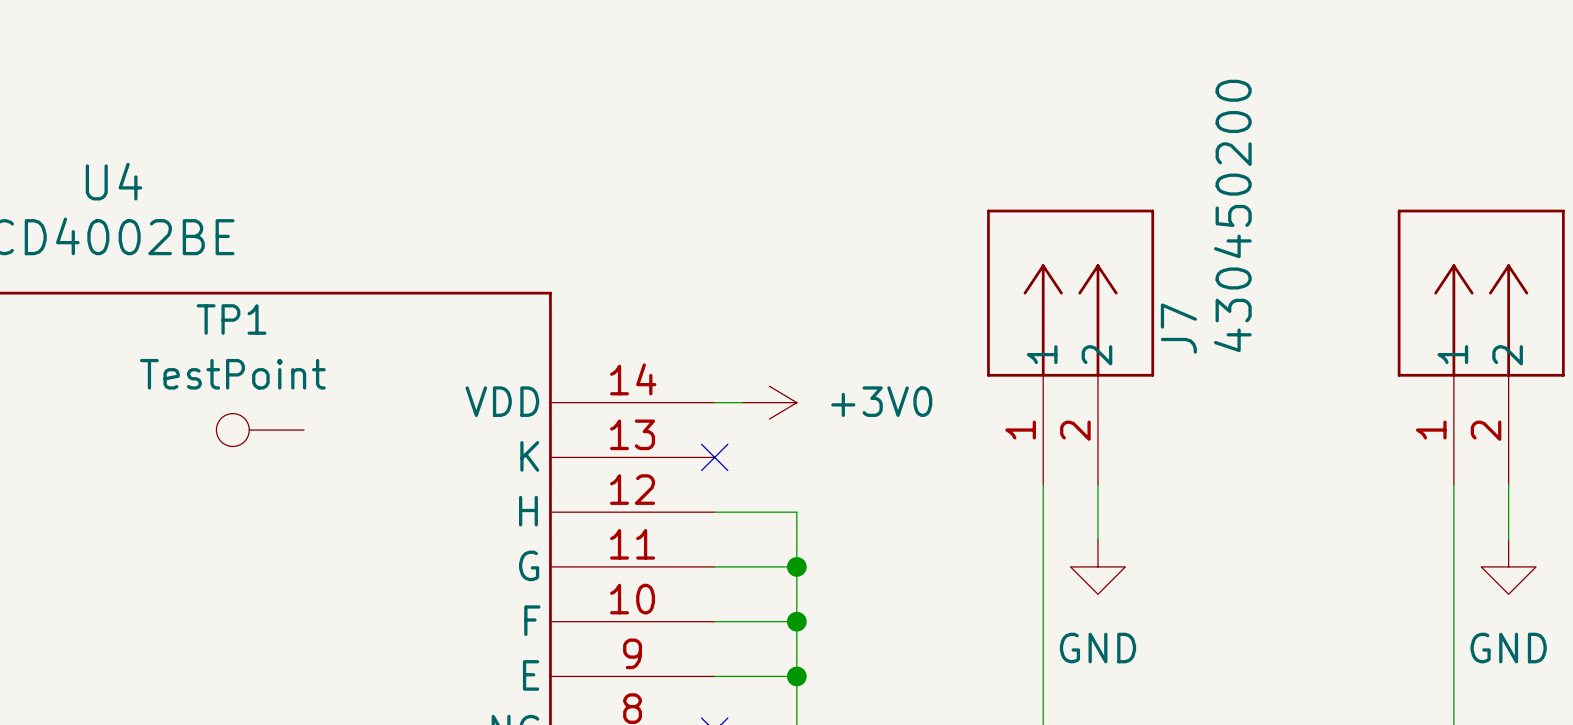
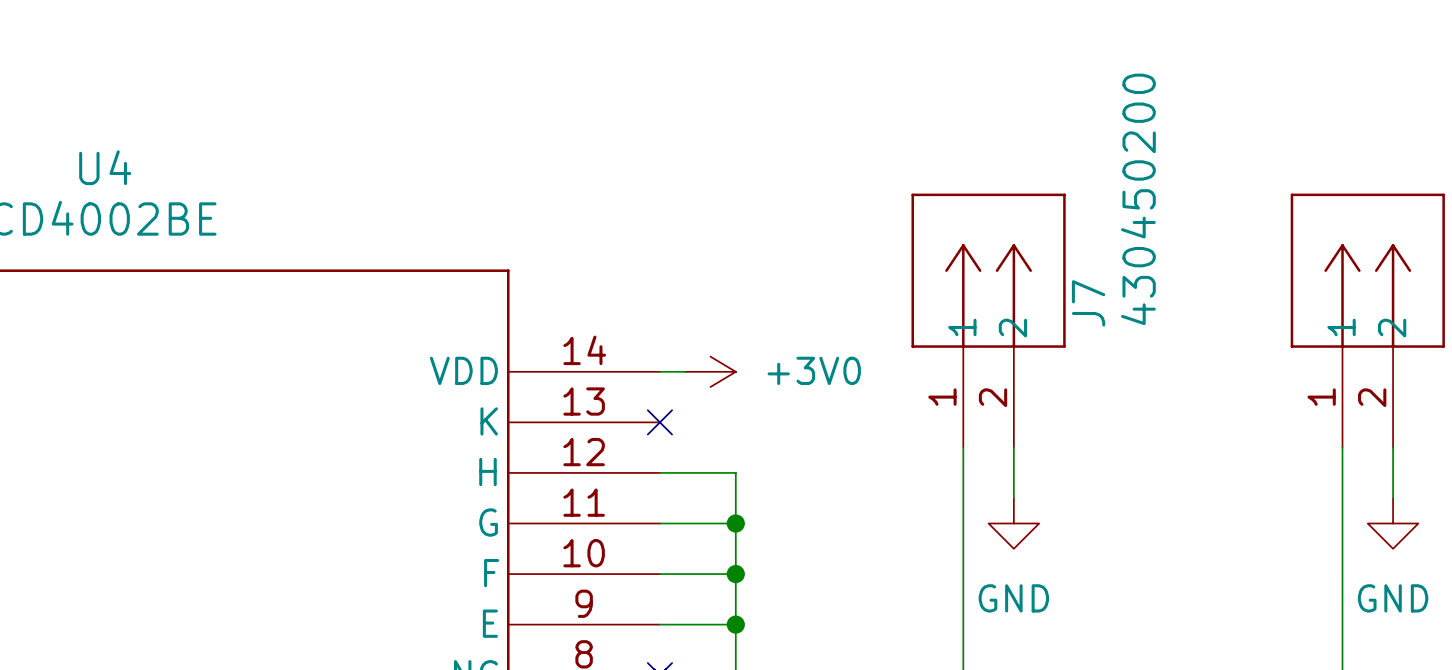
TP1: TestPoint (260, 430) -> none

